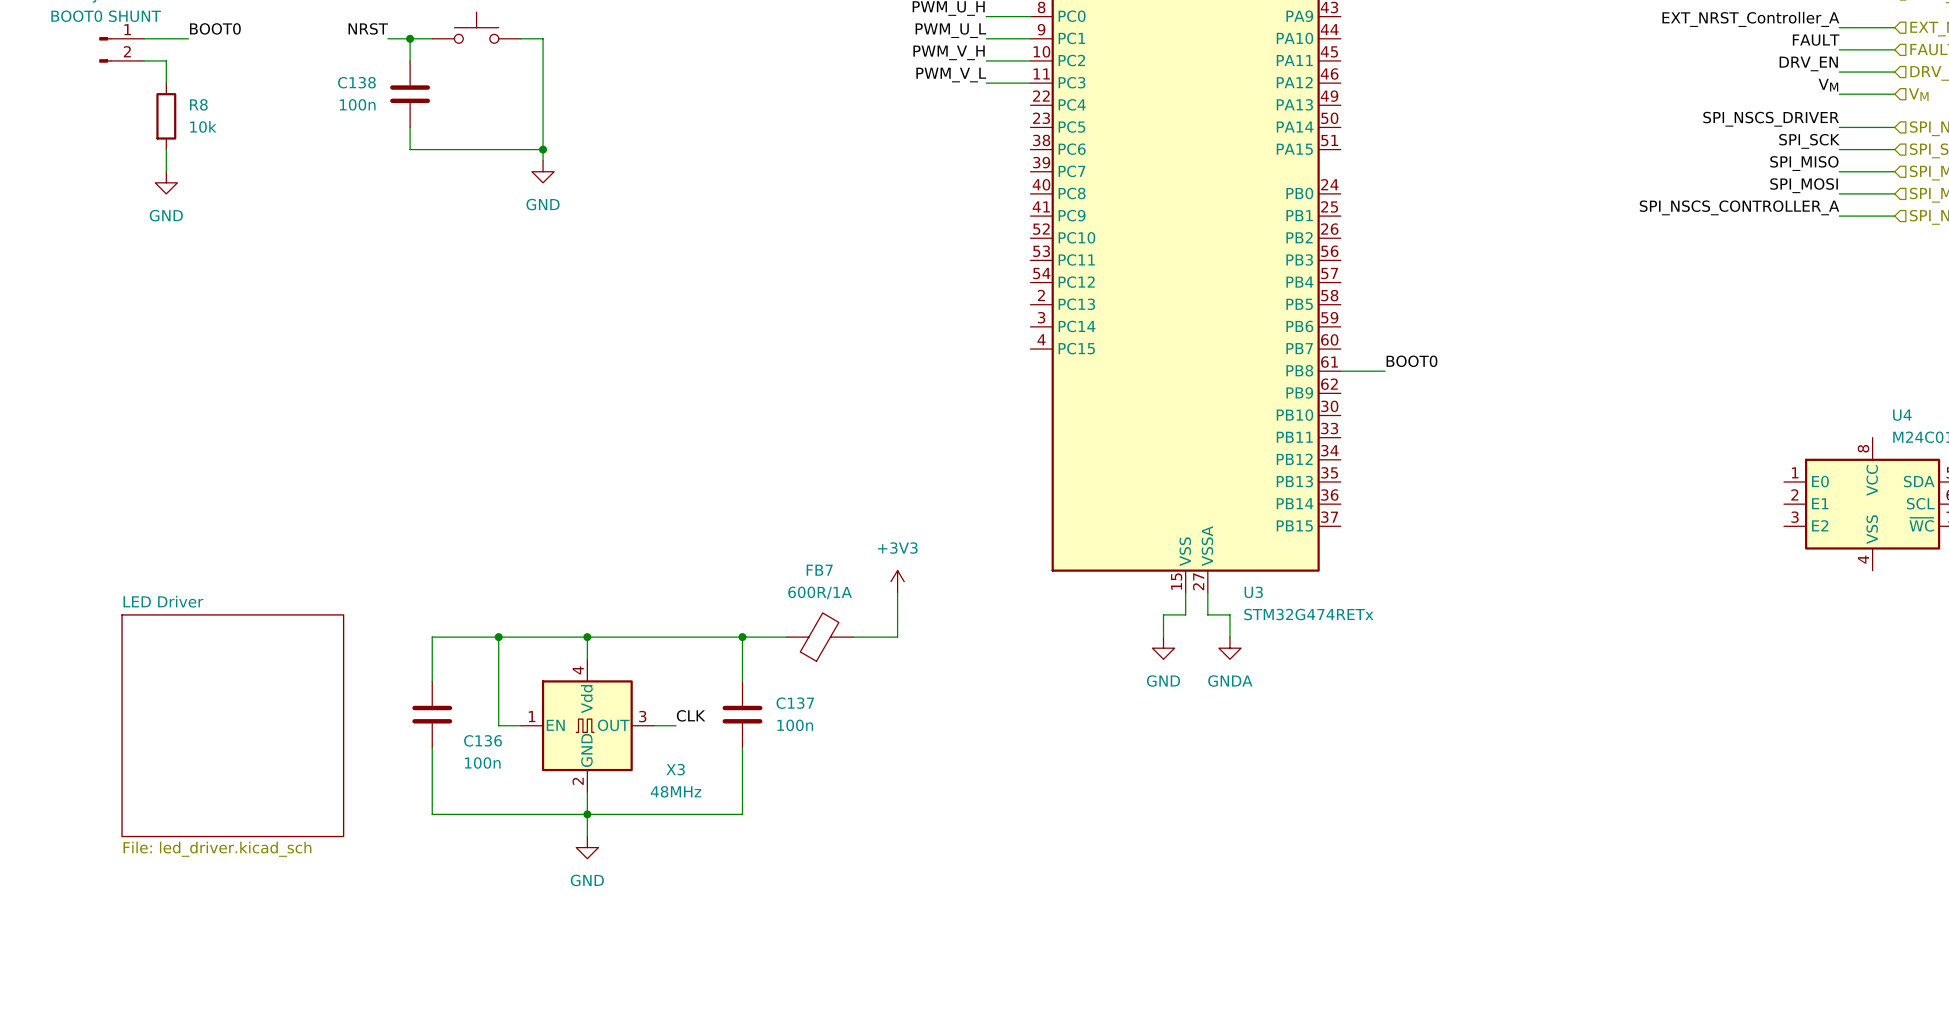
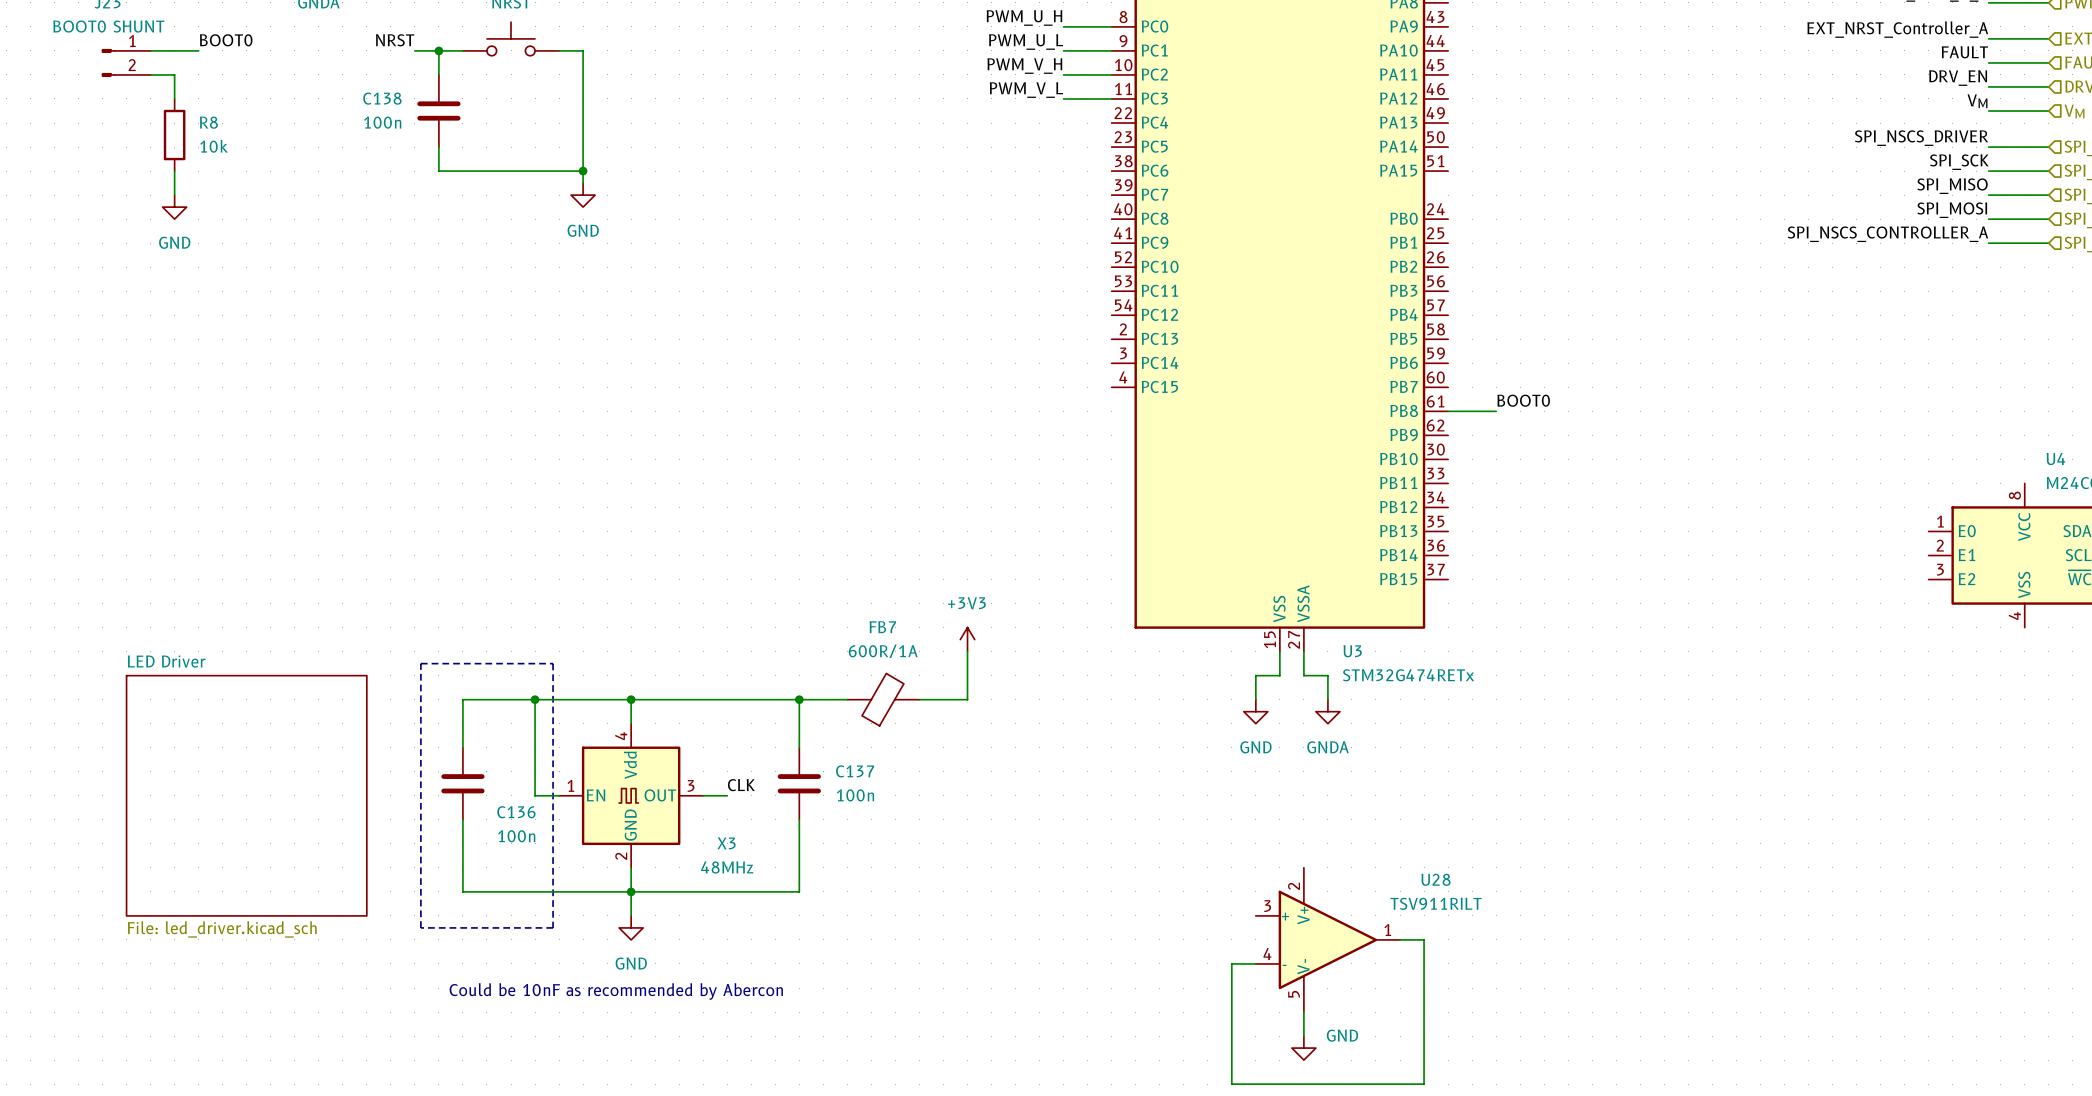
line: none -> (420, 663) (553, 663) (553, 927) (420, 927) (420, 663)
U28: none -> TSV911RILT (1327, 939)
wire: none -> (1400, 939) (1424, 939) (1424, 1084) (1231, 1084) (1231, 963) (1255, 963)
text: none -> Could be 10nF as recommended by Abercon (616, 991)
wire: none -> (1303, 1012) (1303, 1036)
power symbol: none -> GND (1303, 1048)

